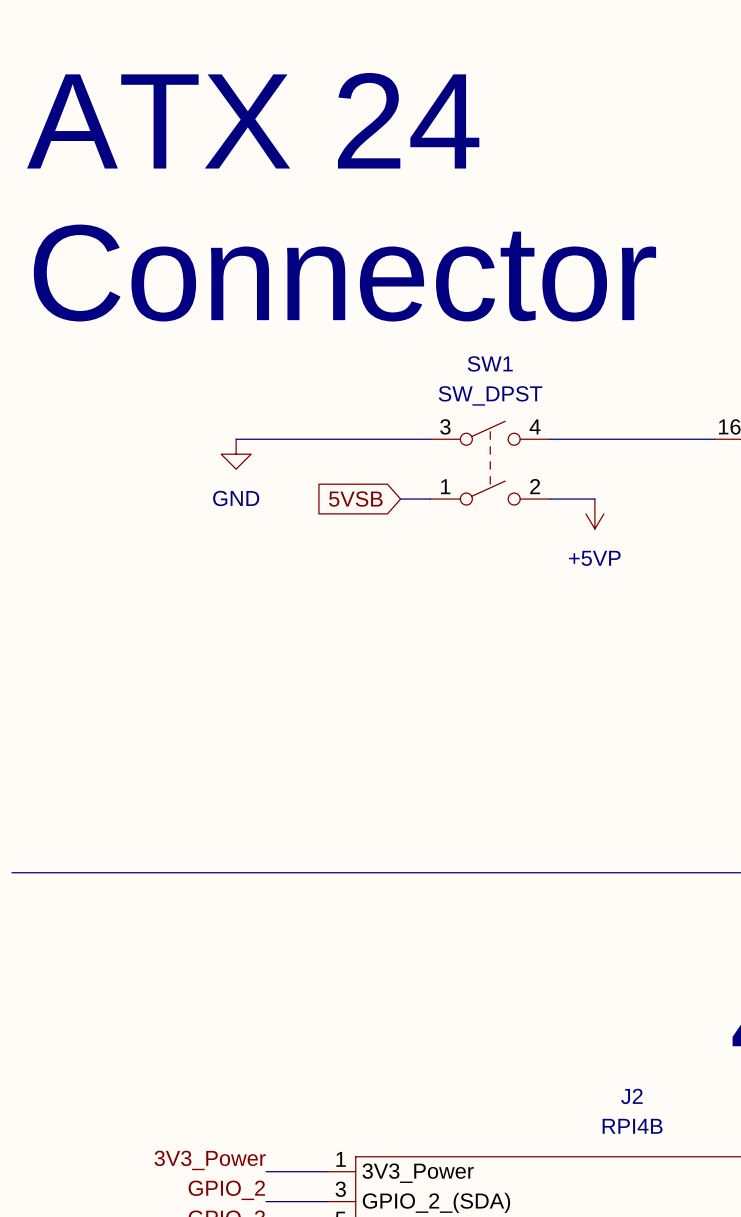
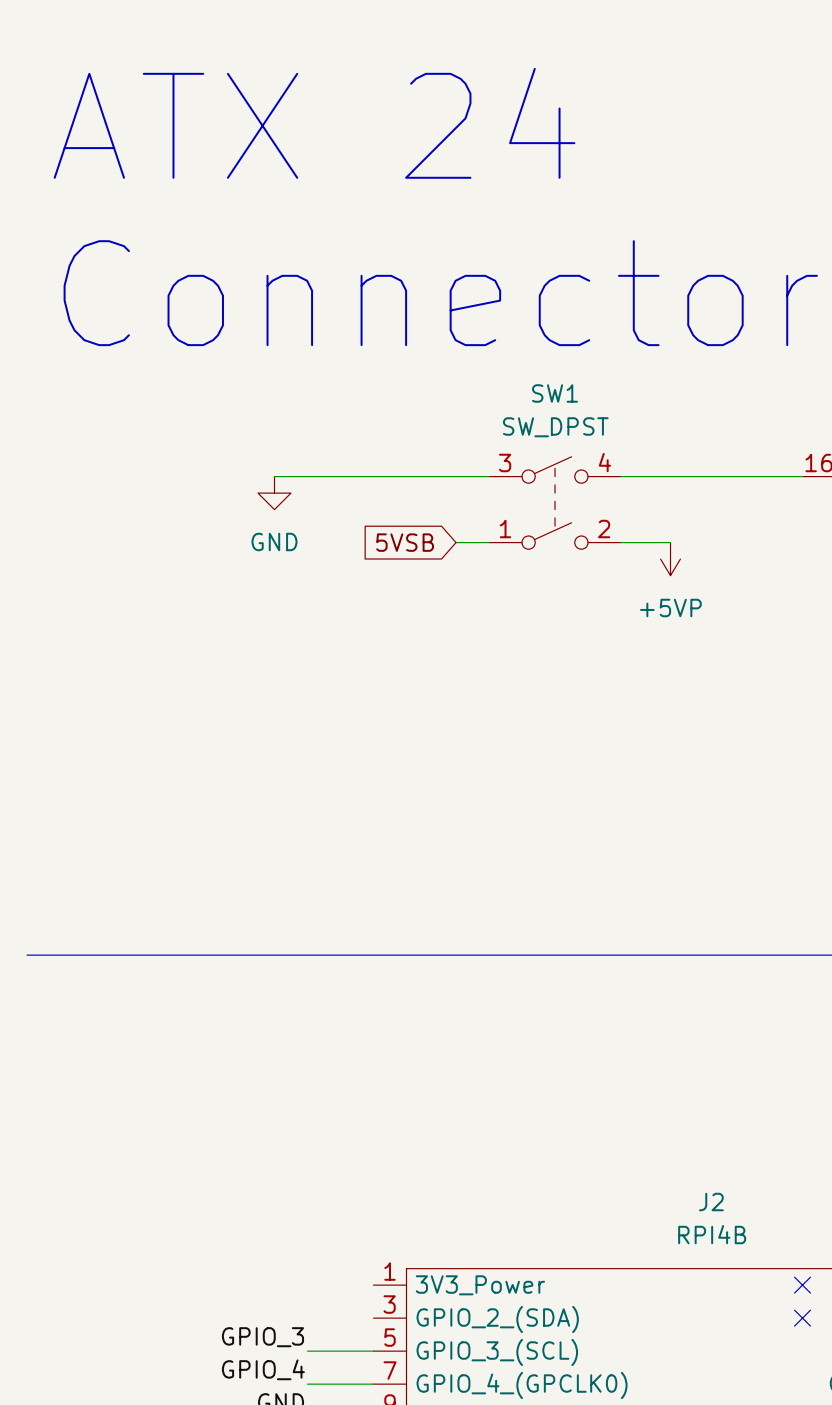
label: 3V3_Power (210, 1160) -> none
wire: (266, 1171) (325, 1171) -> none
no-connect mark: none -> (802, 1285)
label: GPIO_2 (226, 1190) -> none
wire: (266, 1201) (325, 1201) -> none
no-connect mark: none -> (802, 1318)

